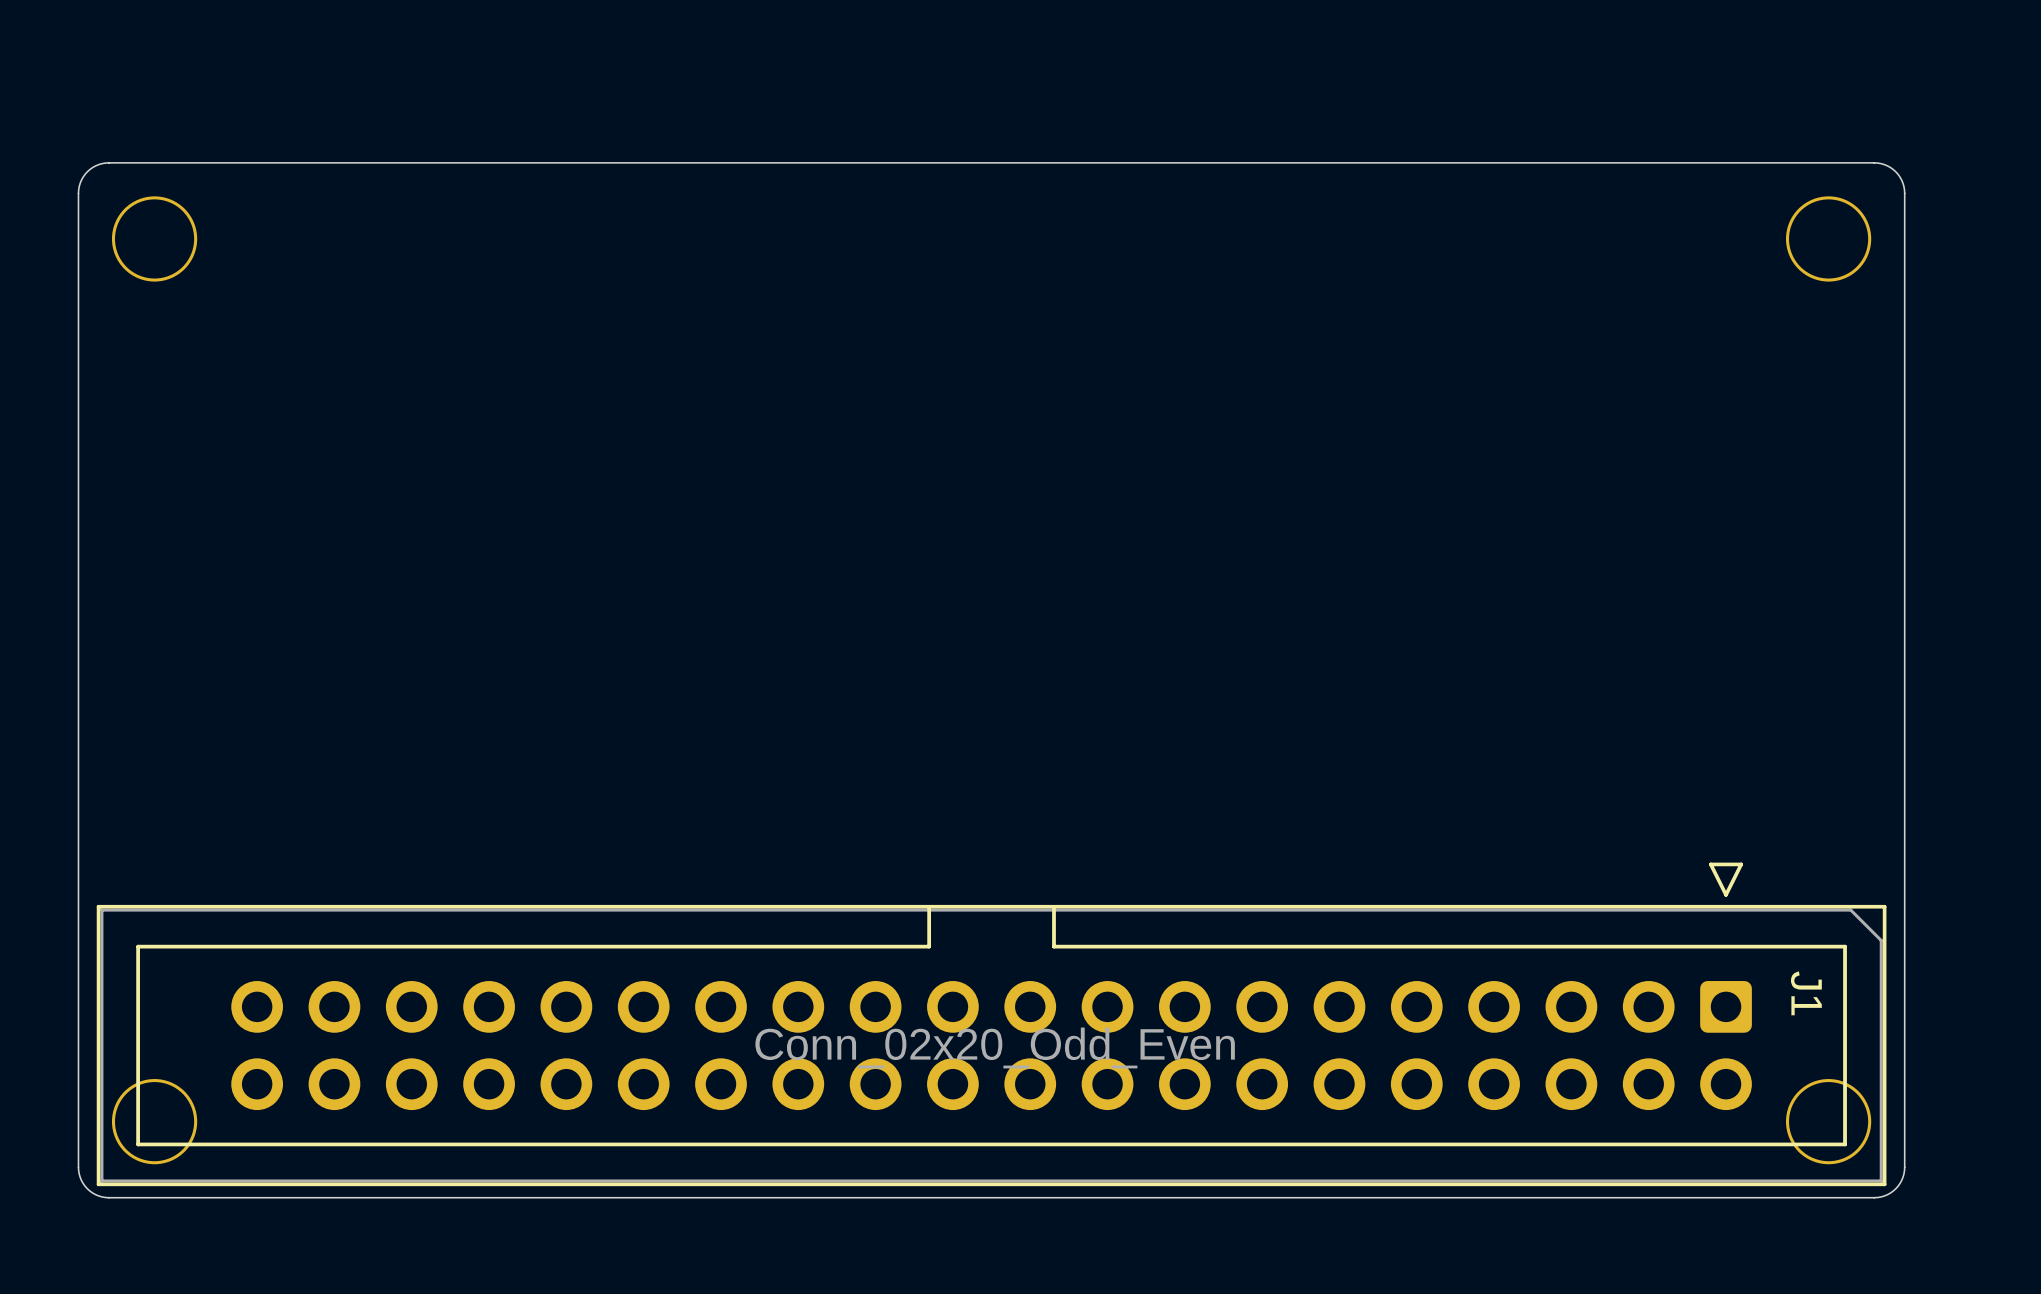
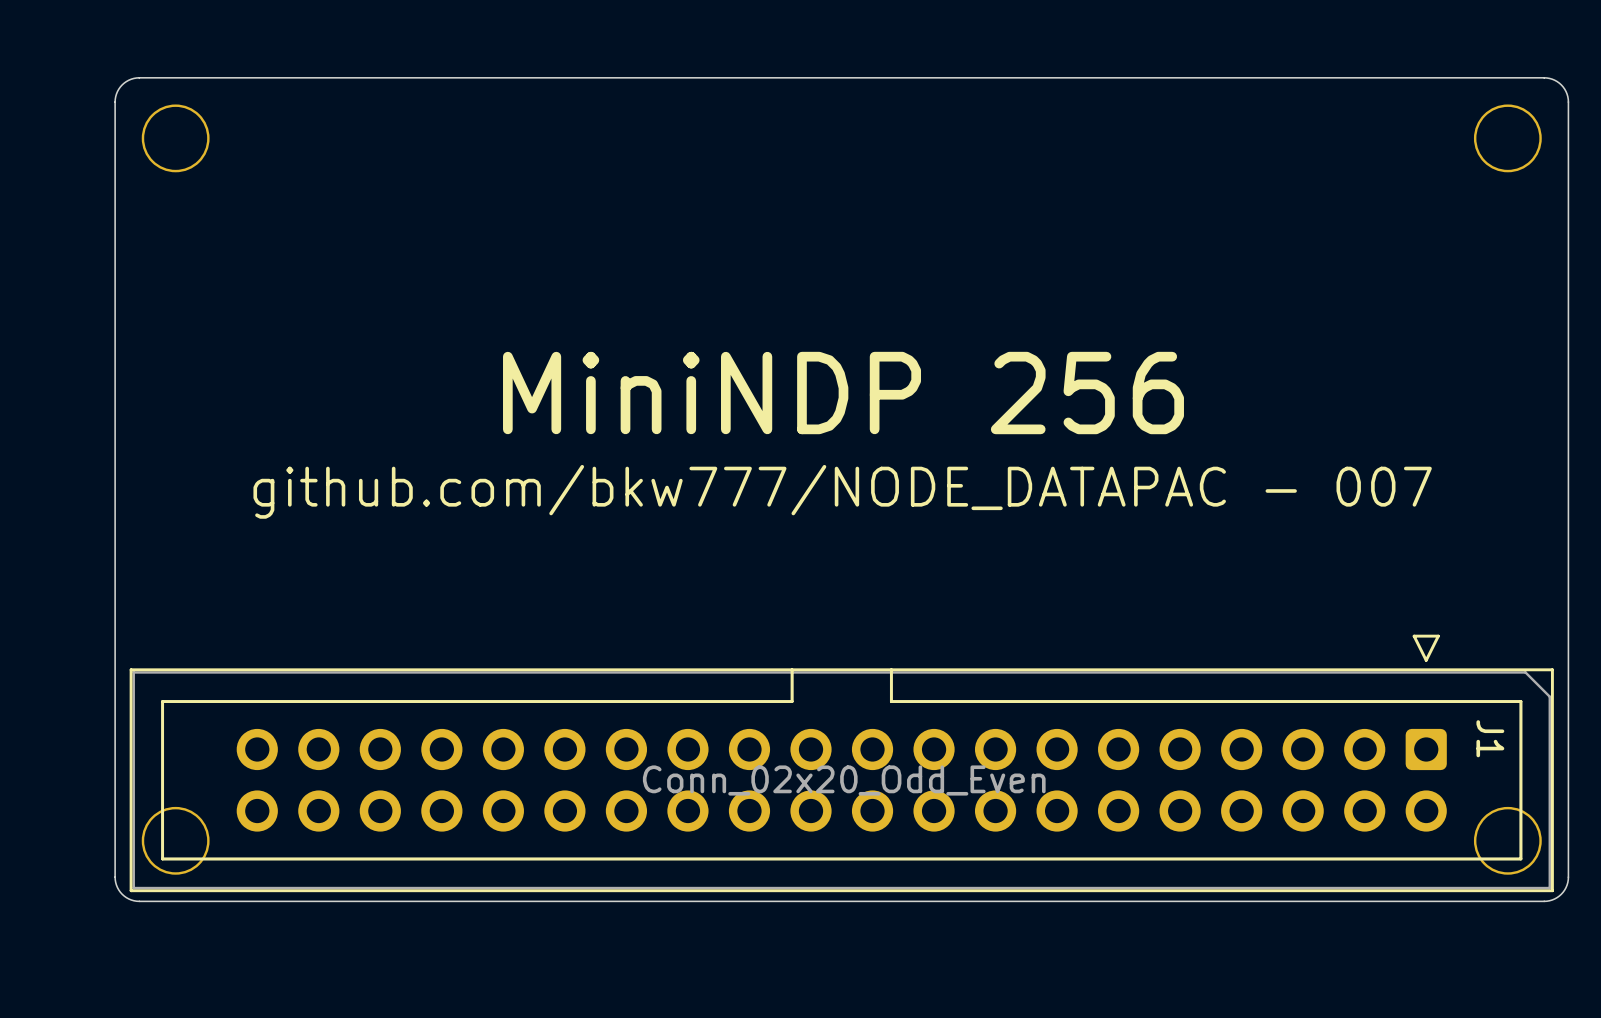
text: none -> MiniNDP 256 (843, 393)
text: none -> github.com/bkw777/NODE_DATAPAC - 007 (842, 491)

